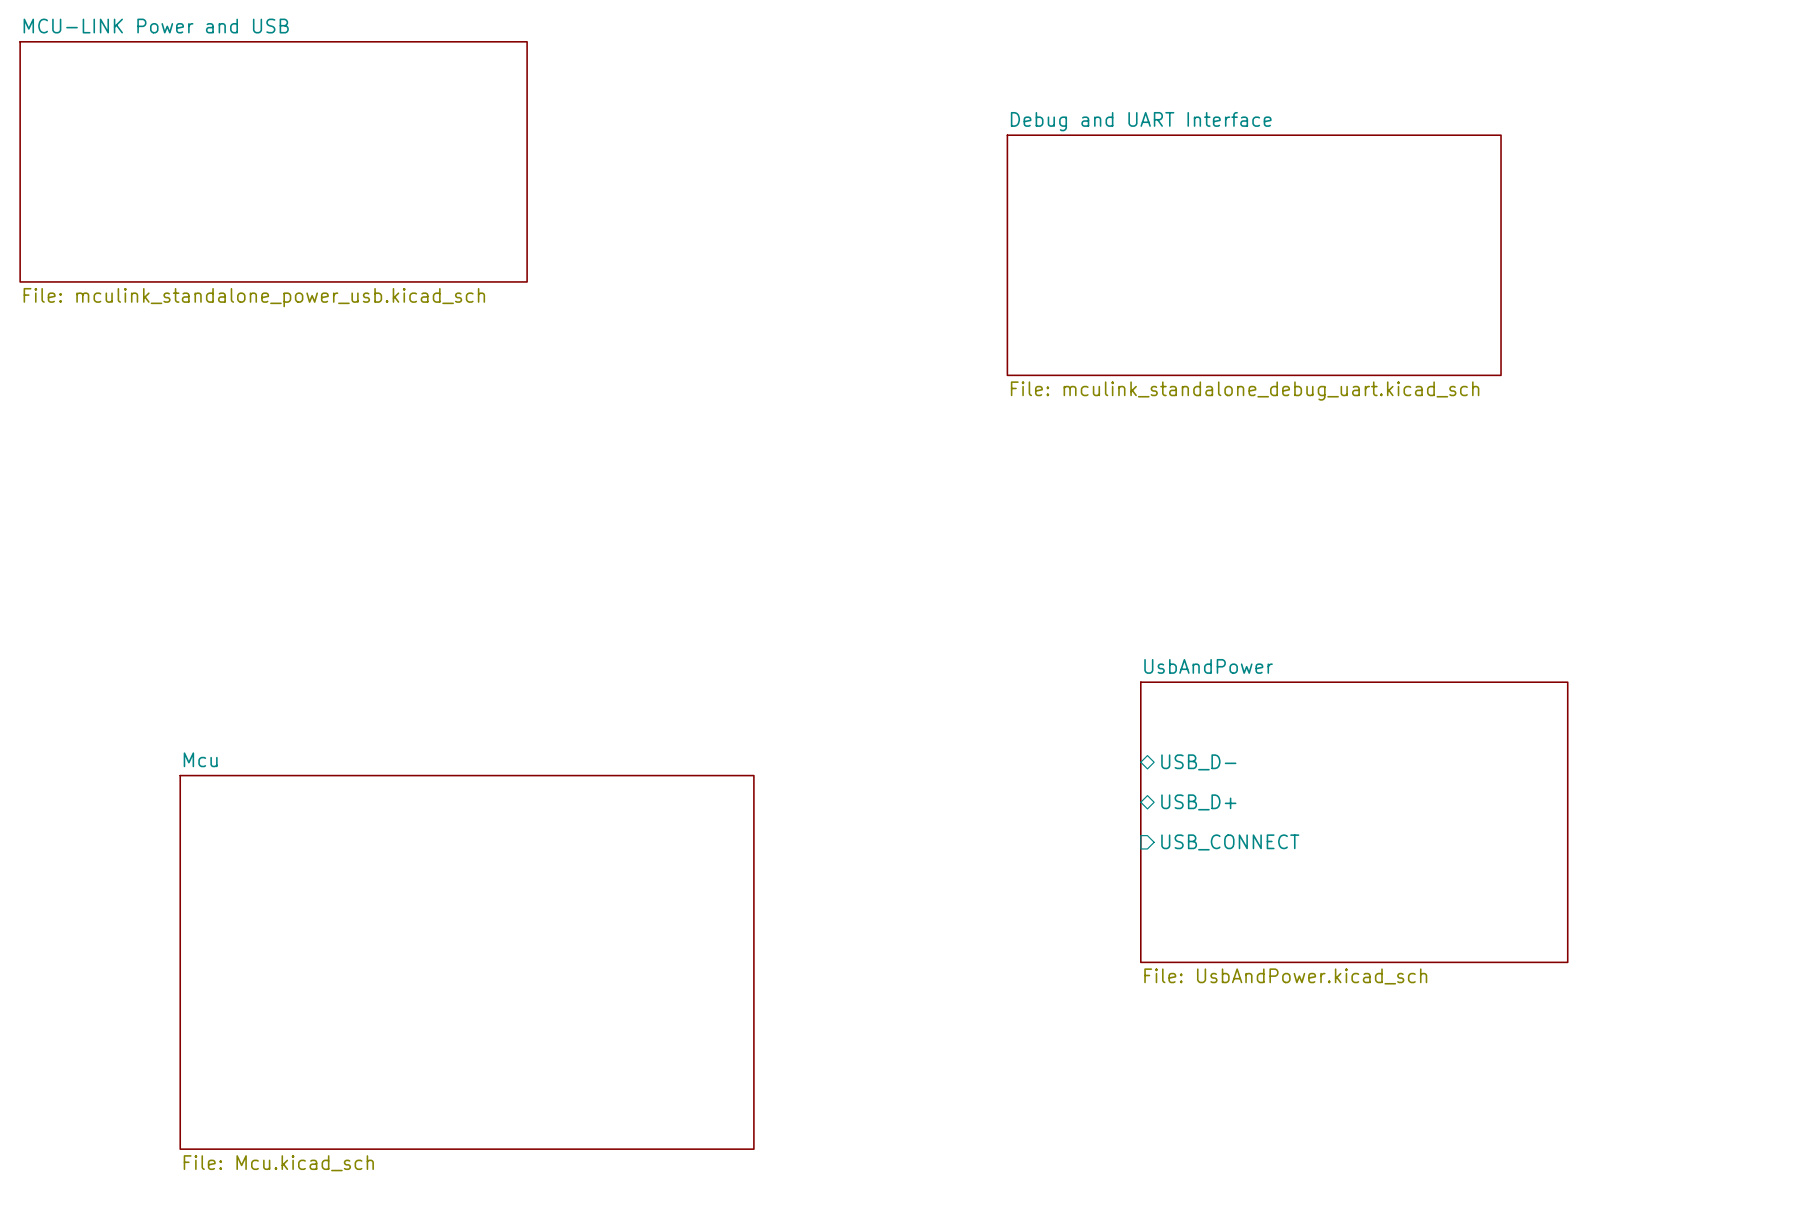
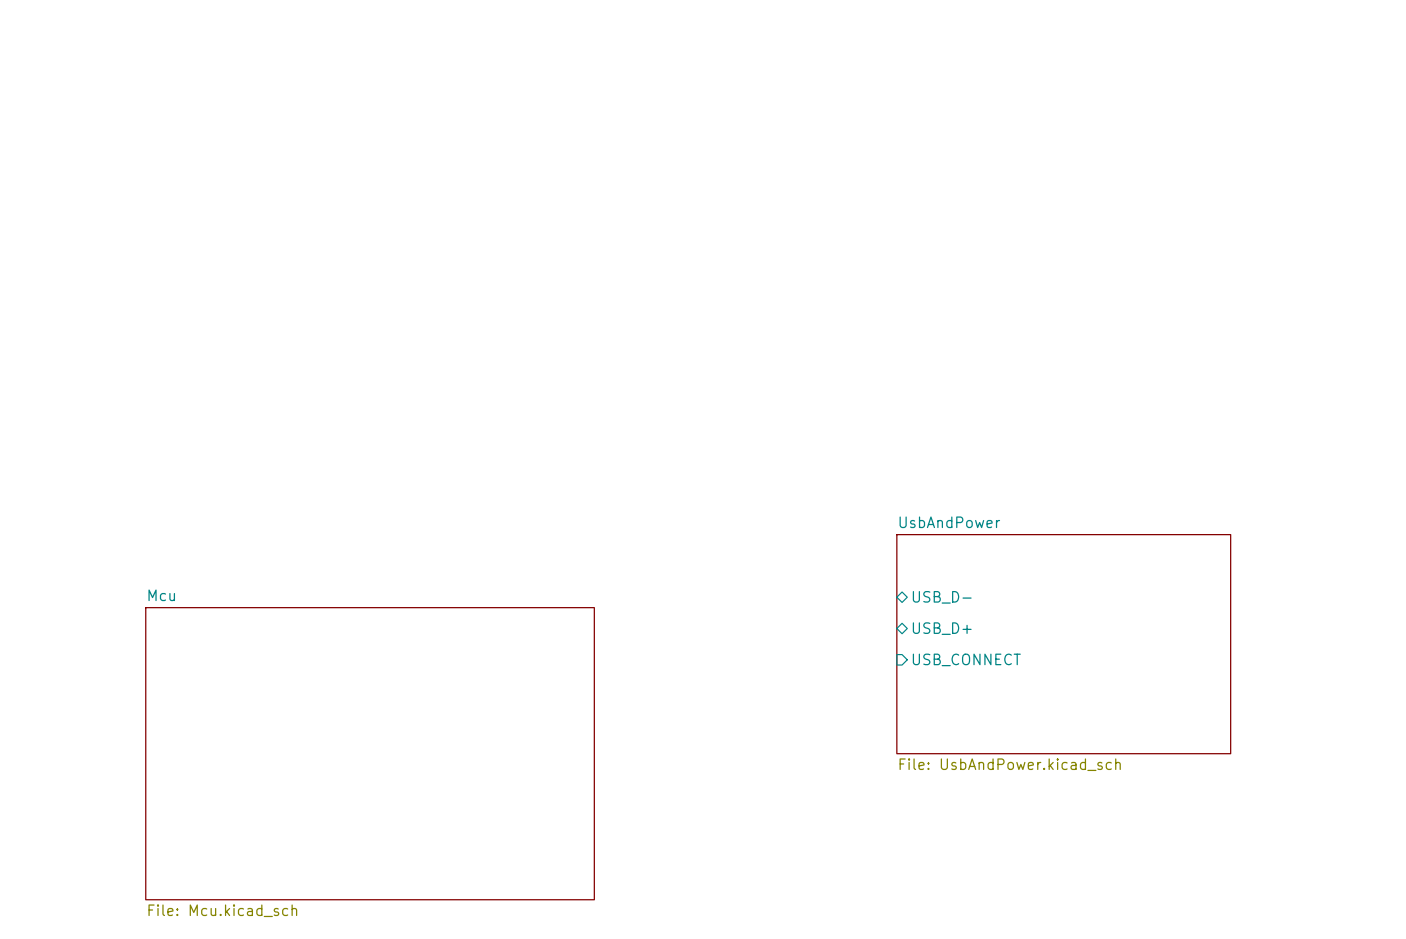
sheet MCU-LINK Power and USB: File: mculink_standalone_power_usb.kicad_sch (273, 161) -> none
sheet Debug and UART Interface: File: mculink_standalone_debug_uart.kicad_sch (1254, 255) -> none

